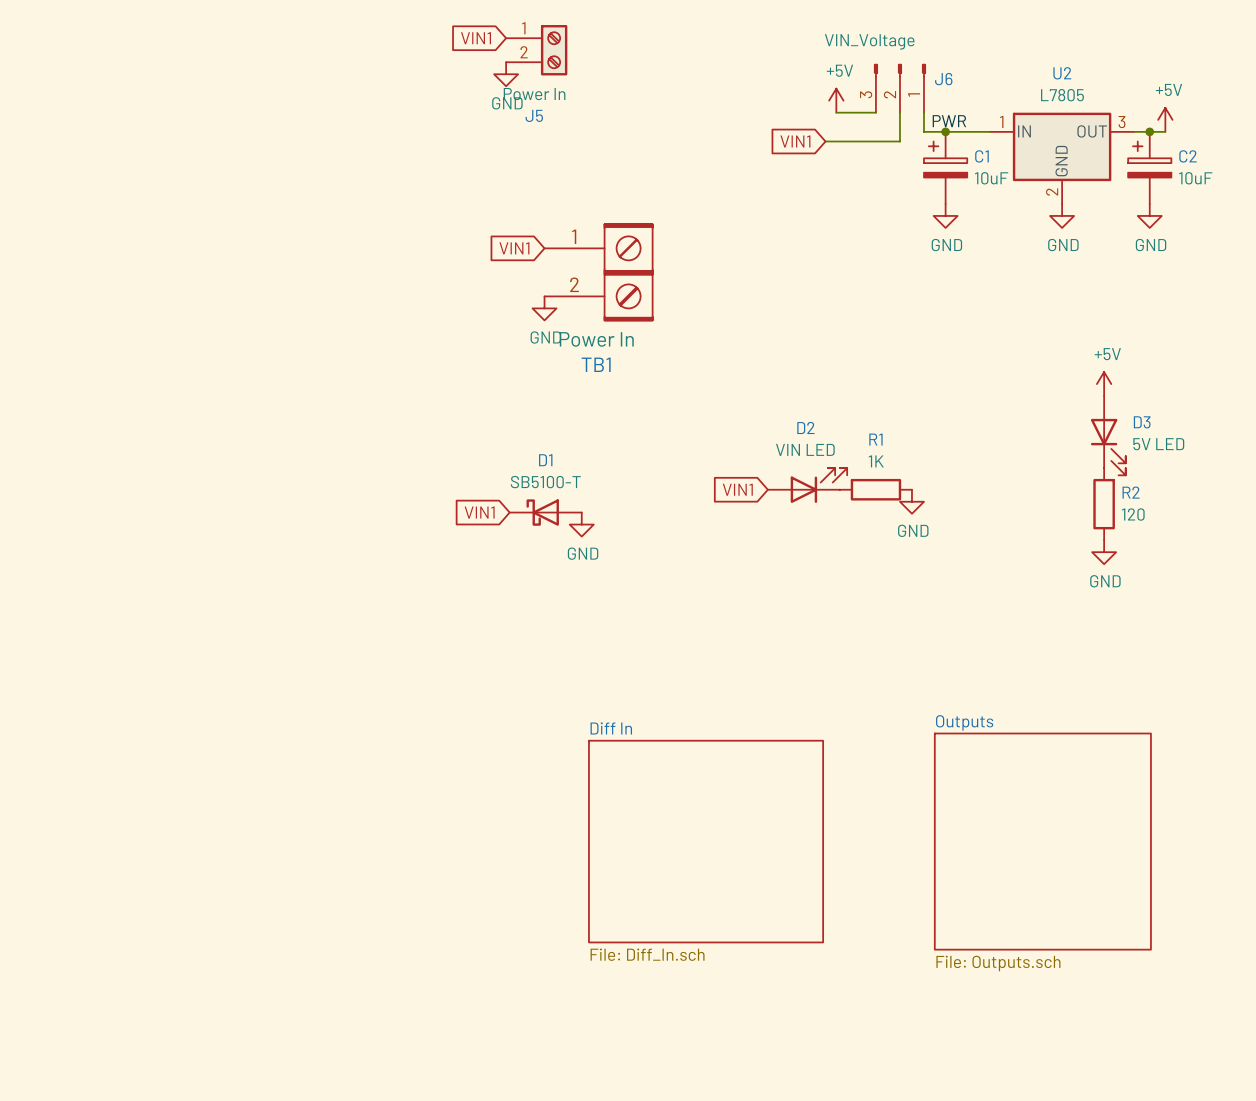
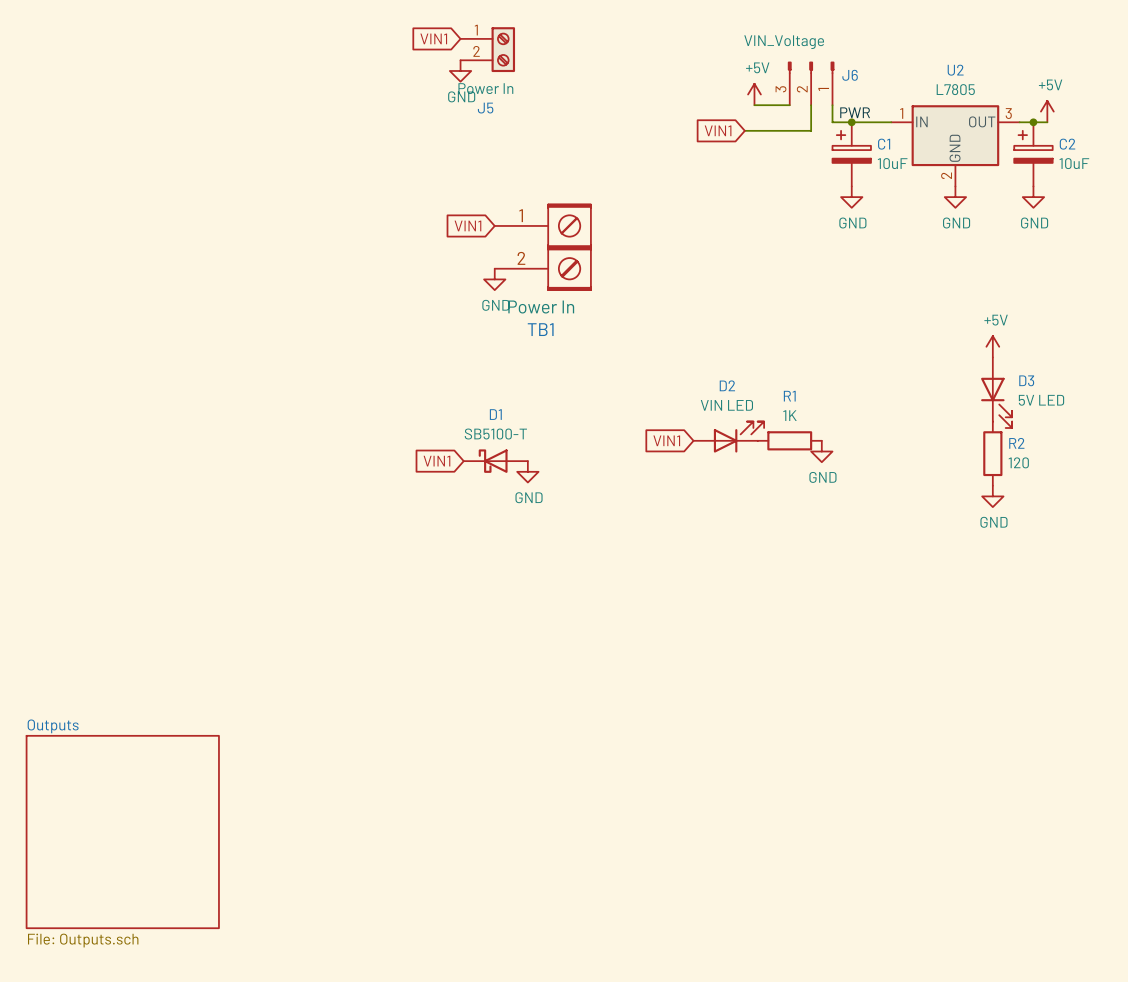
sheet Diff In: File: Diff_In.sch (706, 841) -> none
sheet Outputs: File: Outputs.sch (1042, 841) -> none
sheet Outputs: none -> File: Outputs.sch (122, 832)

